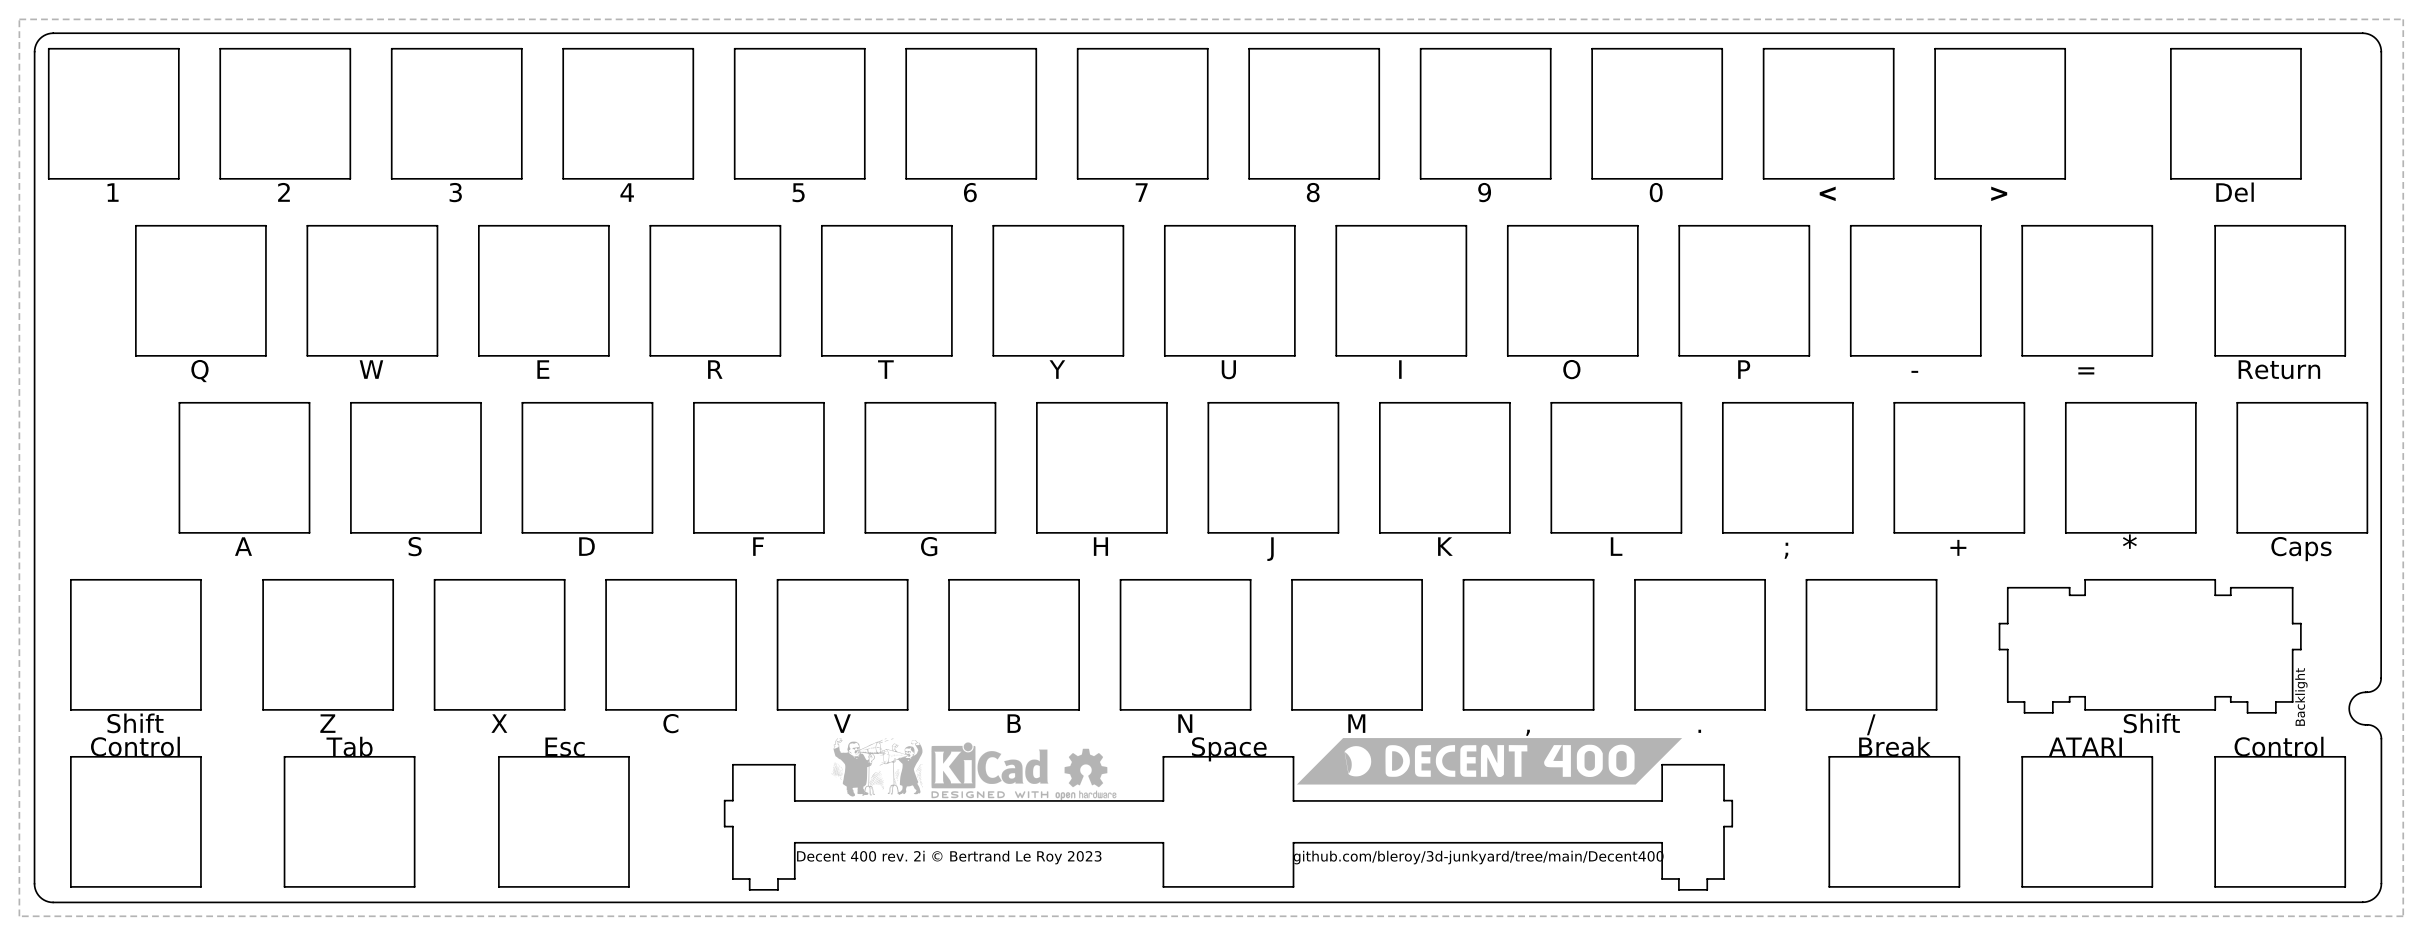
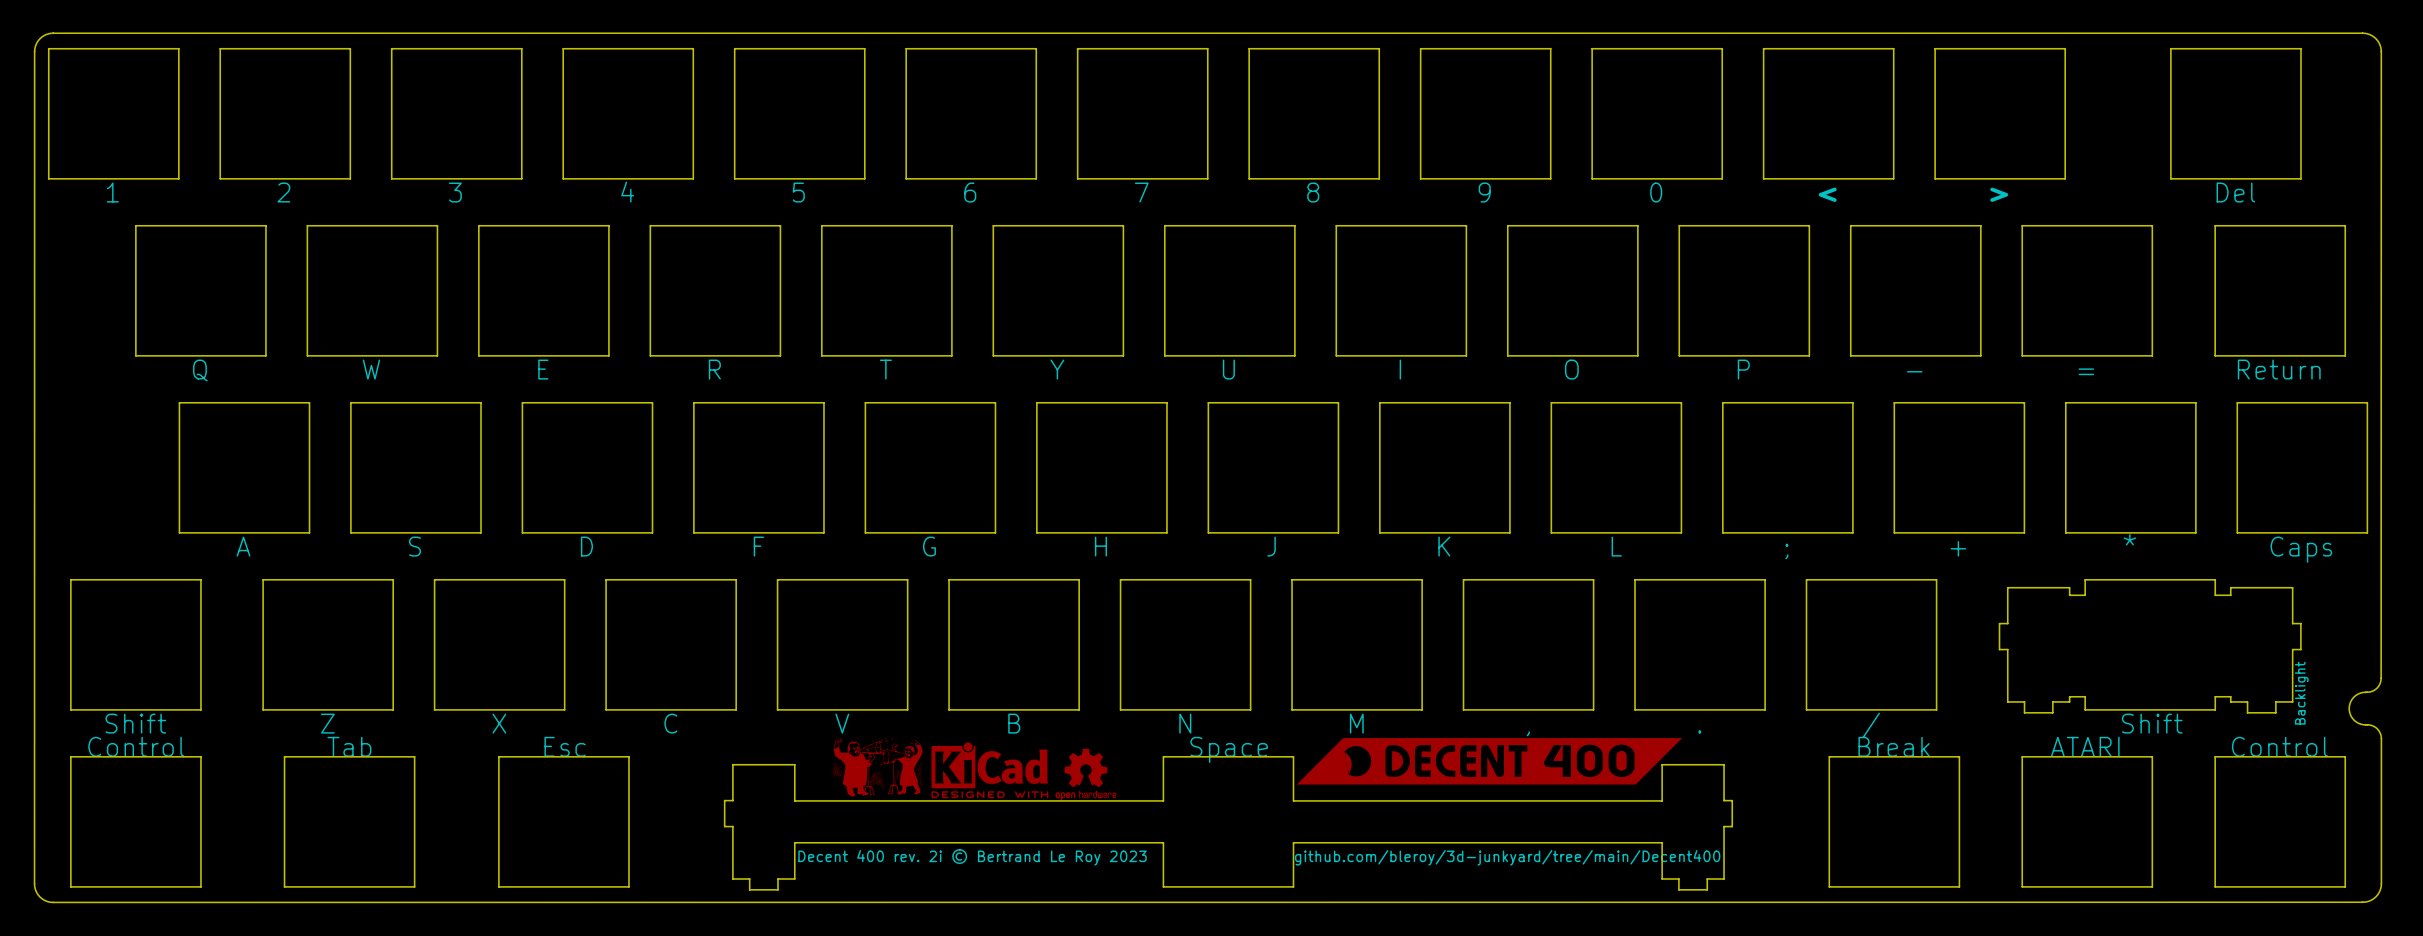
zone outline: (19, 19) (2403, 19) (2403, 916) (19, 916) (19, 19) -> none

